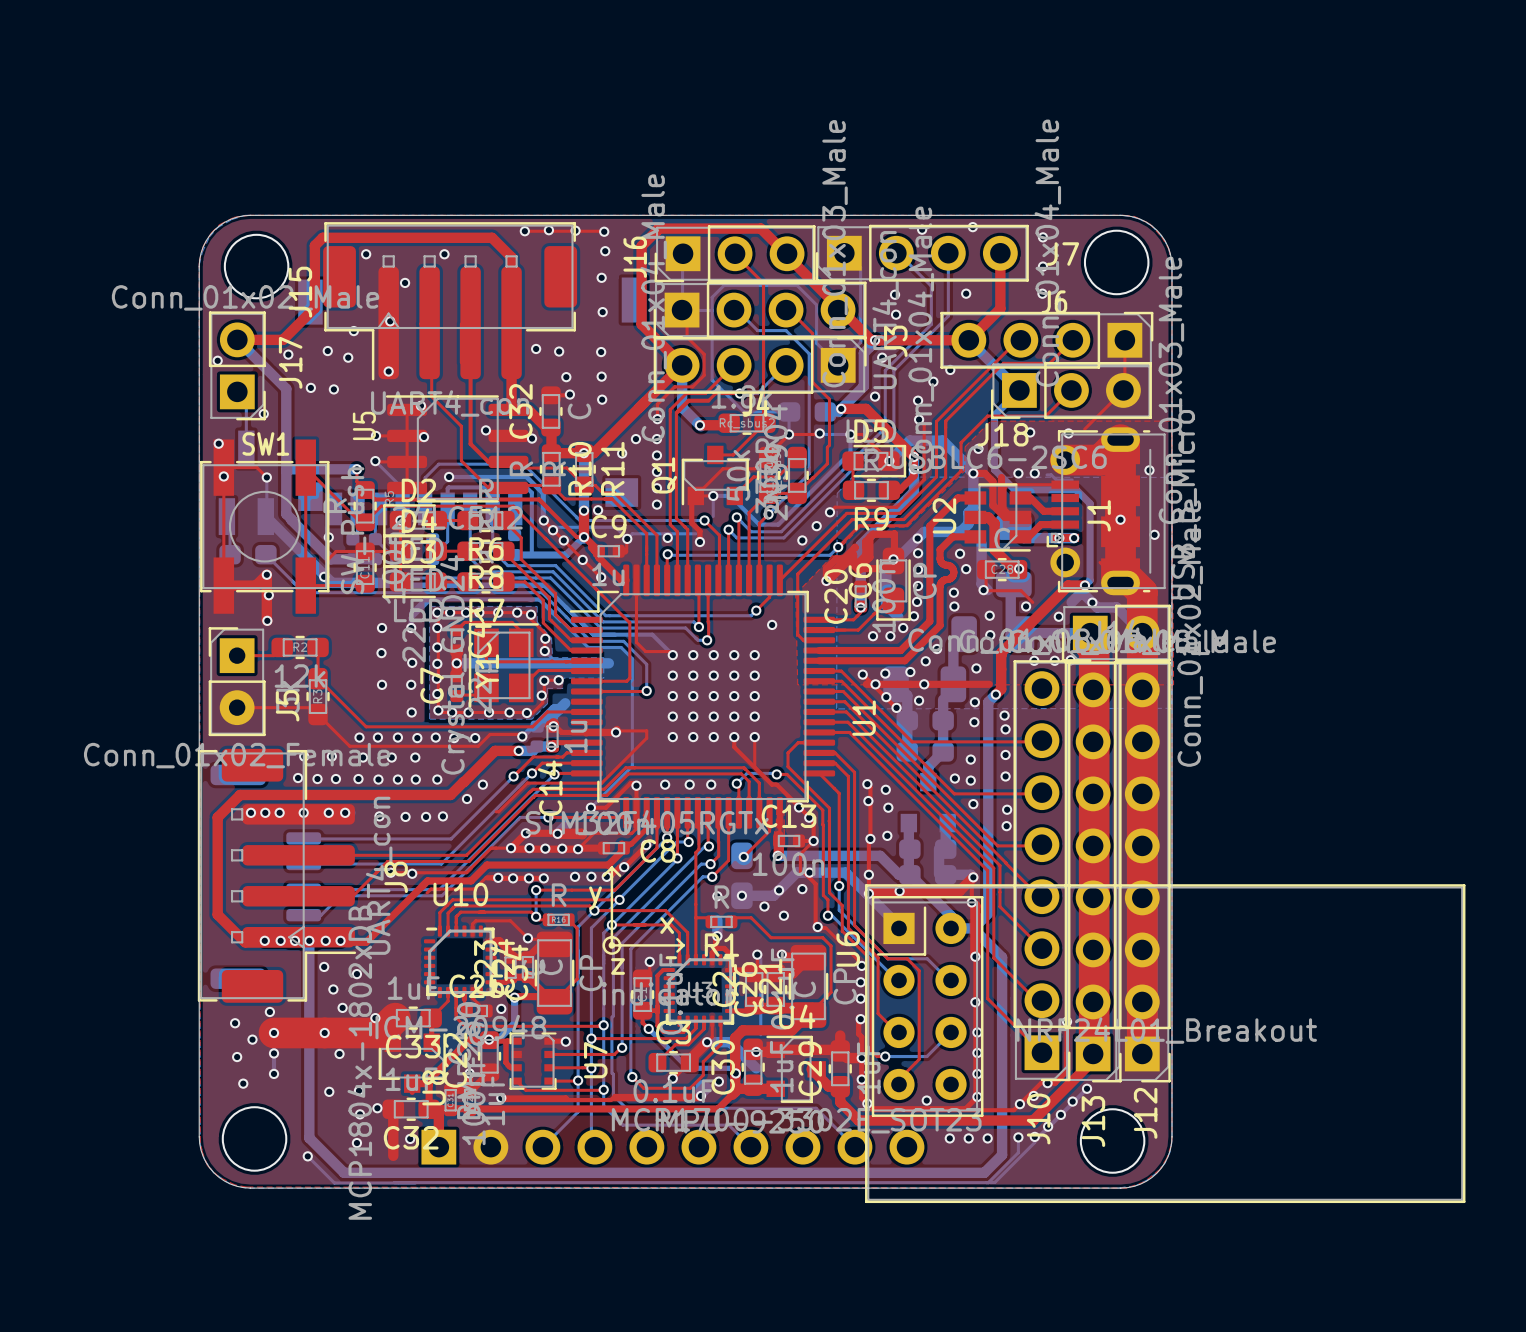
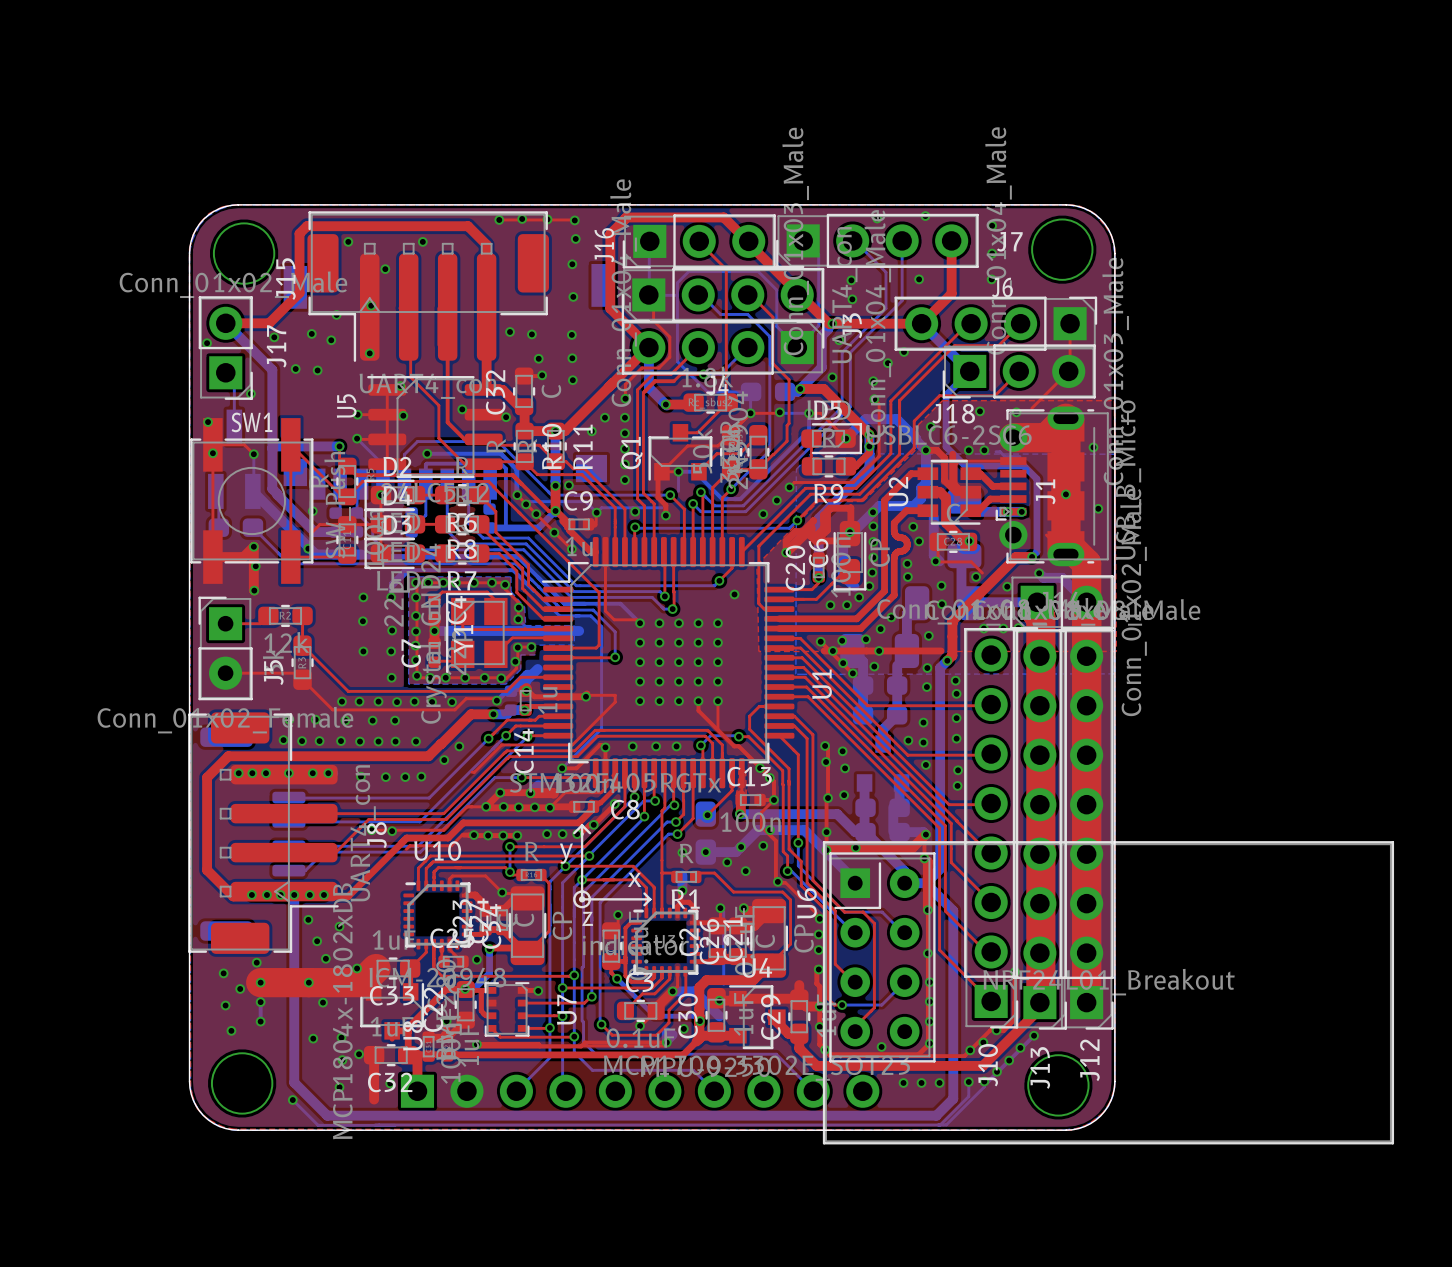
bottom track: (1071, 602) (1081, 592) (1092, 602) -> none

